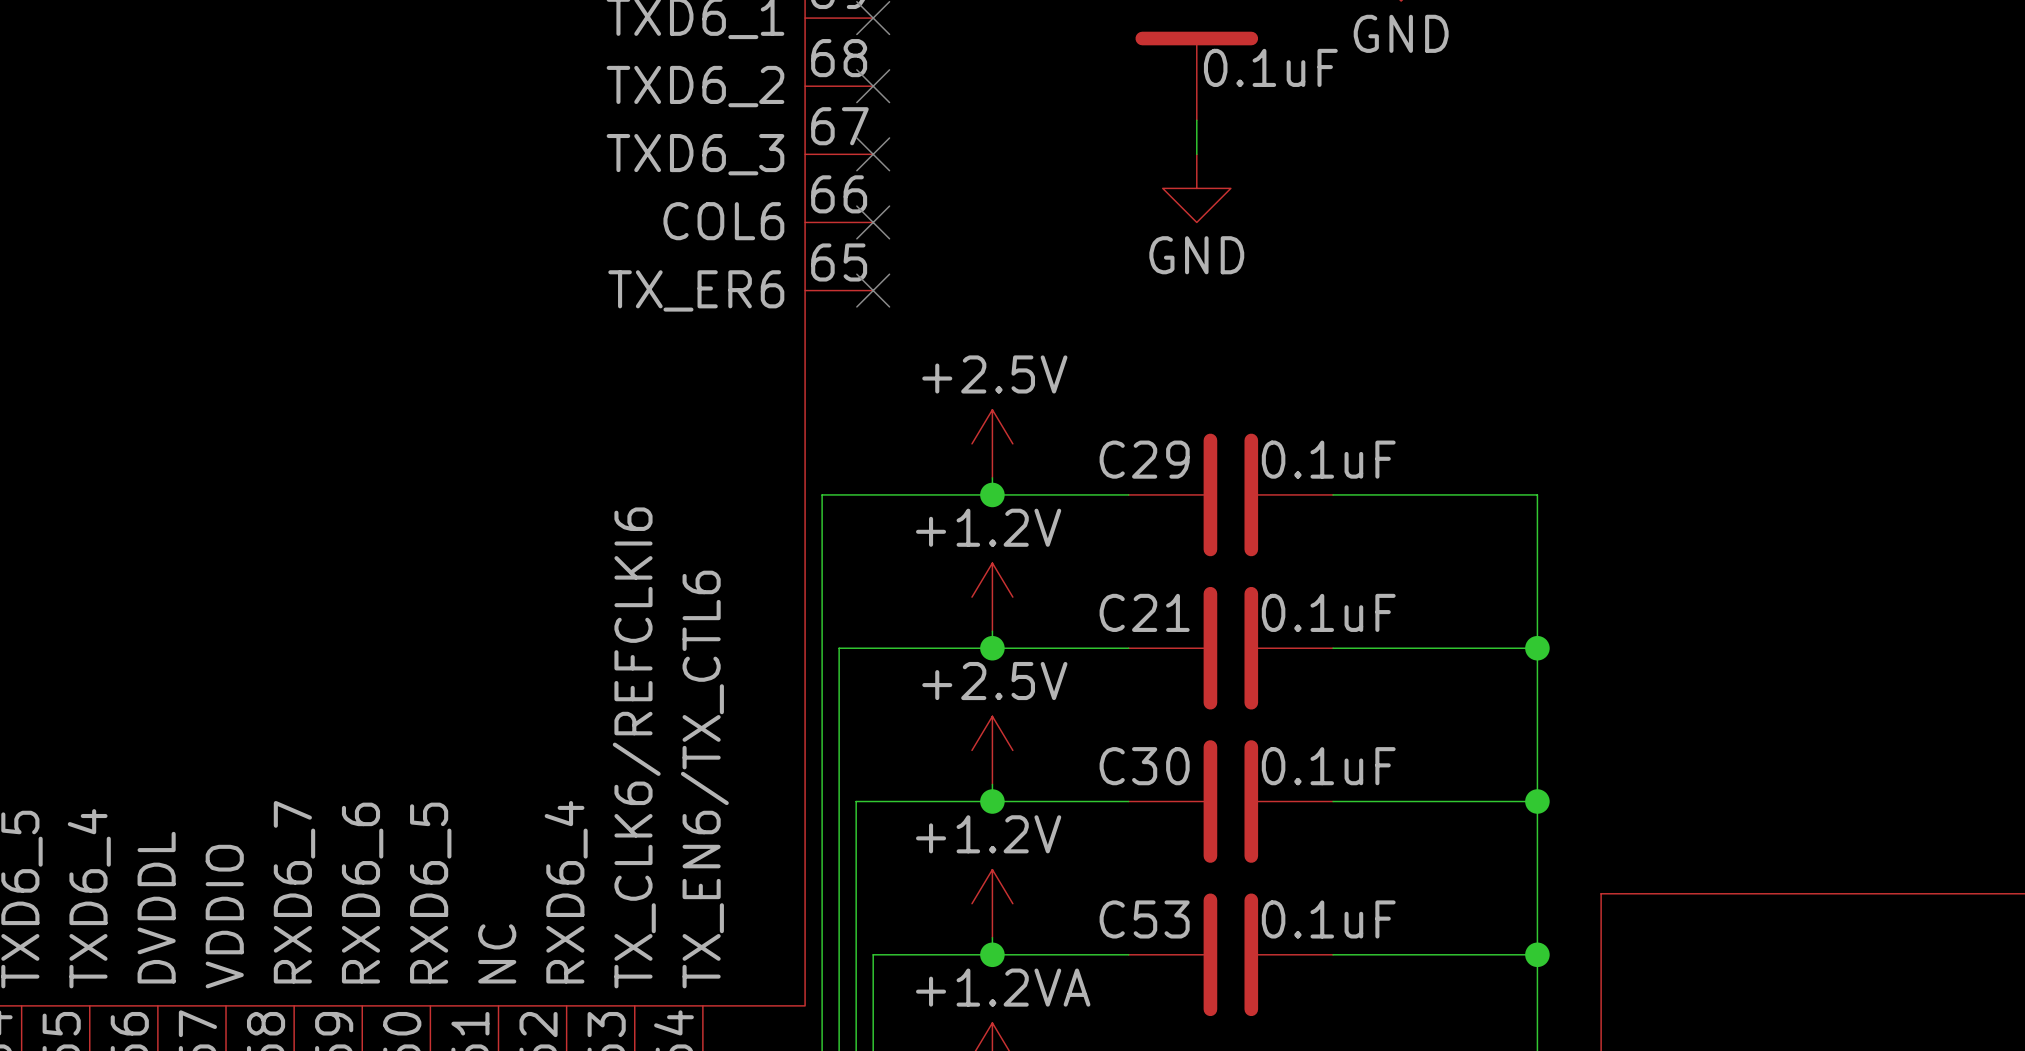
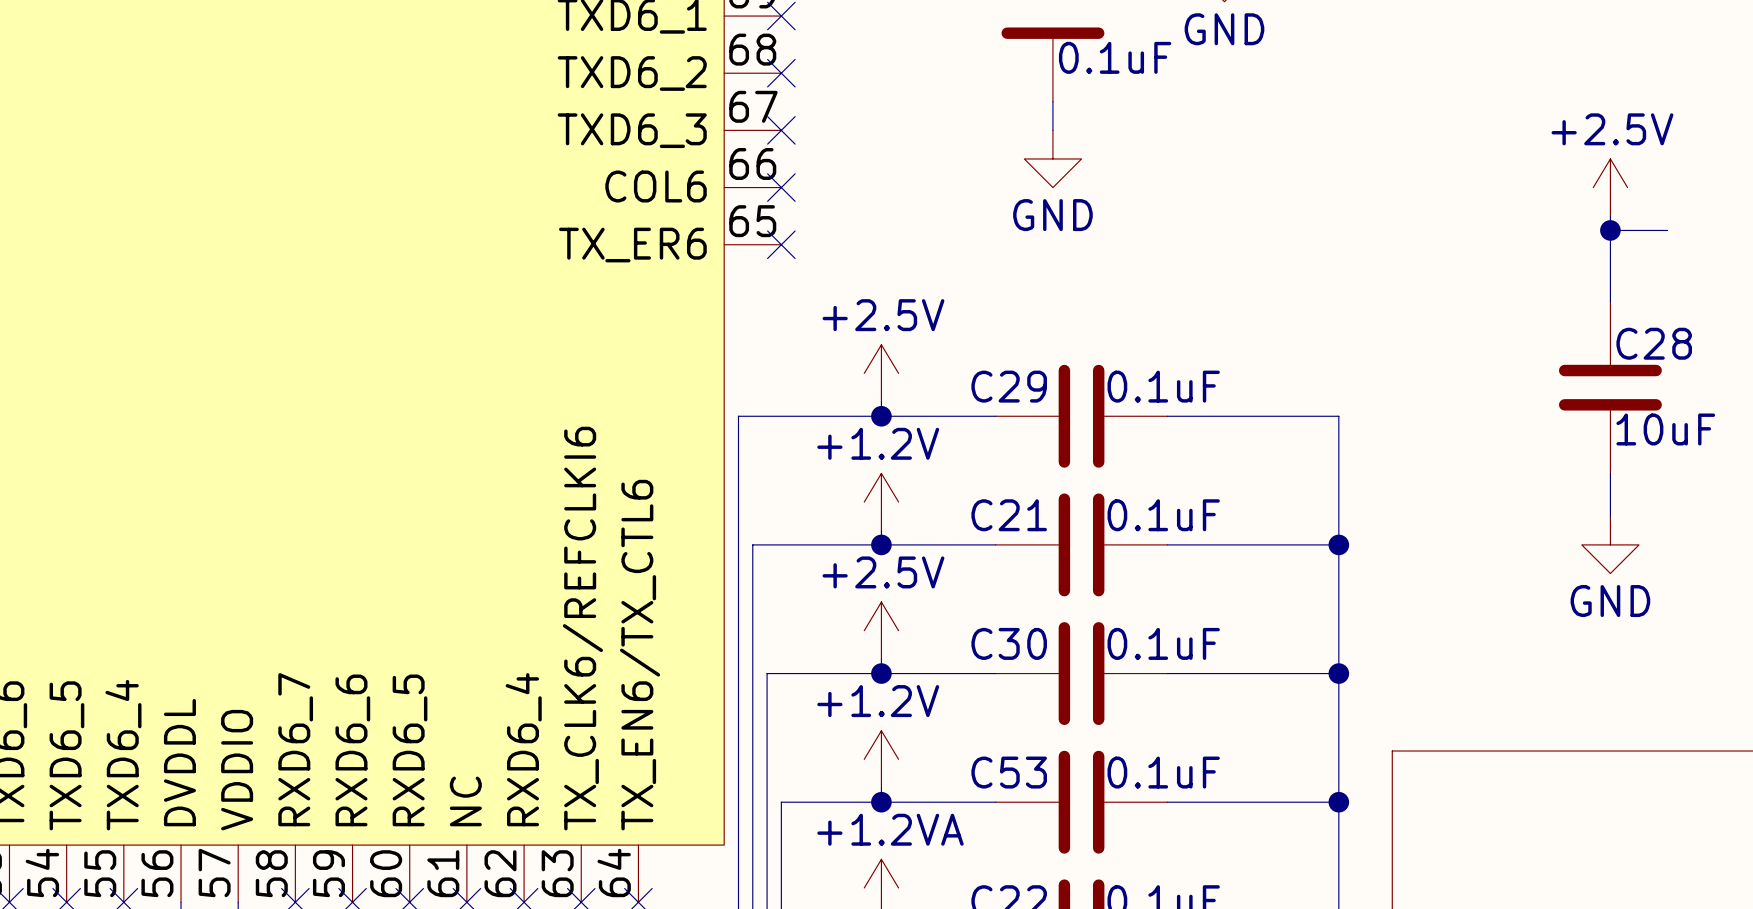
power symbol: none -> +2.5V (1610, 187)
wire: none -> (1610, 216) (1610, 301)
wire: none -> (1610, 230) (1667, 230)
junction: none -> (1610, 230)
C28: none -> 10uF (1610, 387)
wire: none -> (1610, 473) (1610, 516)
power symbol: none -> GND (1610, 544)

